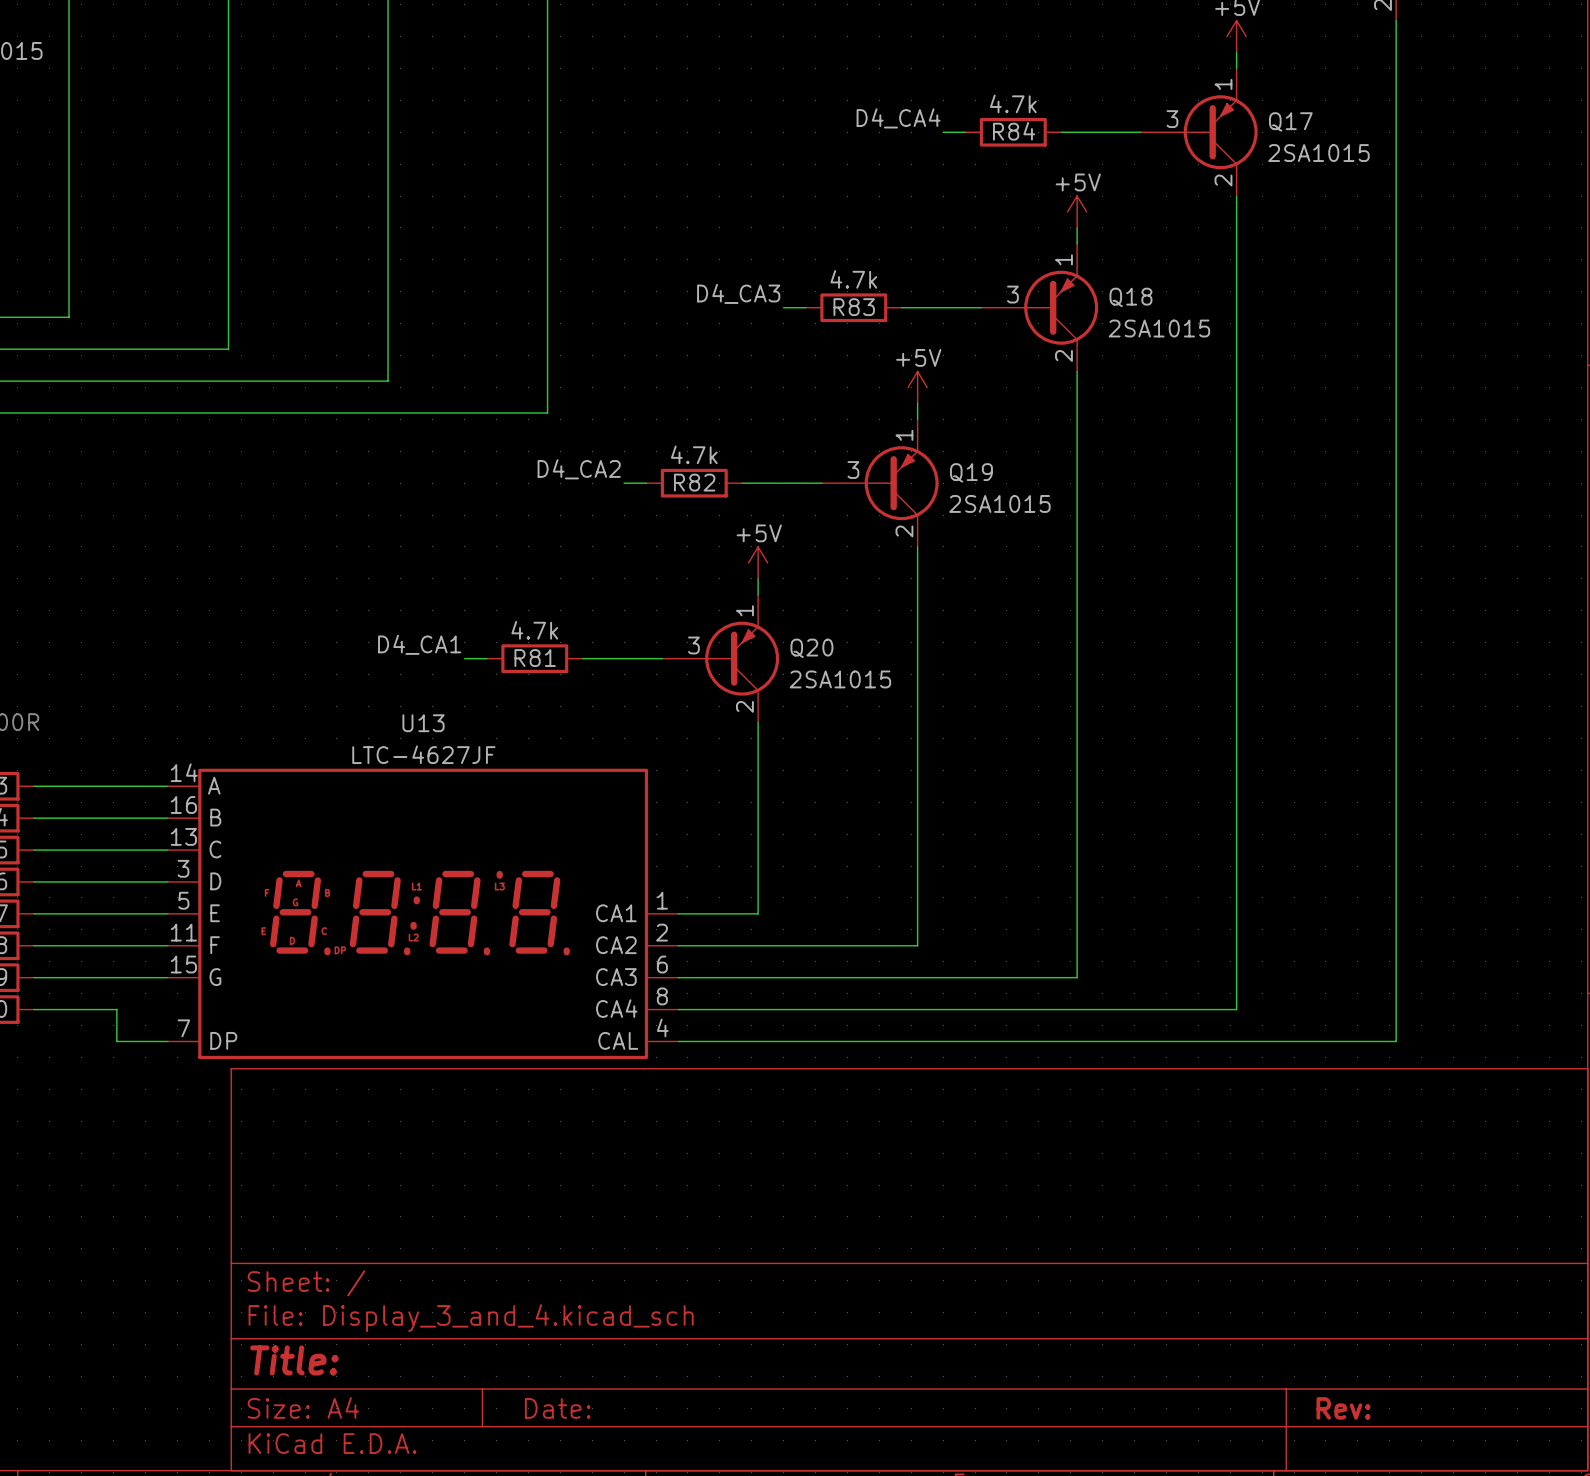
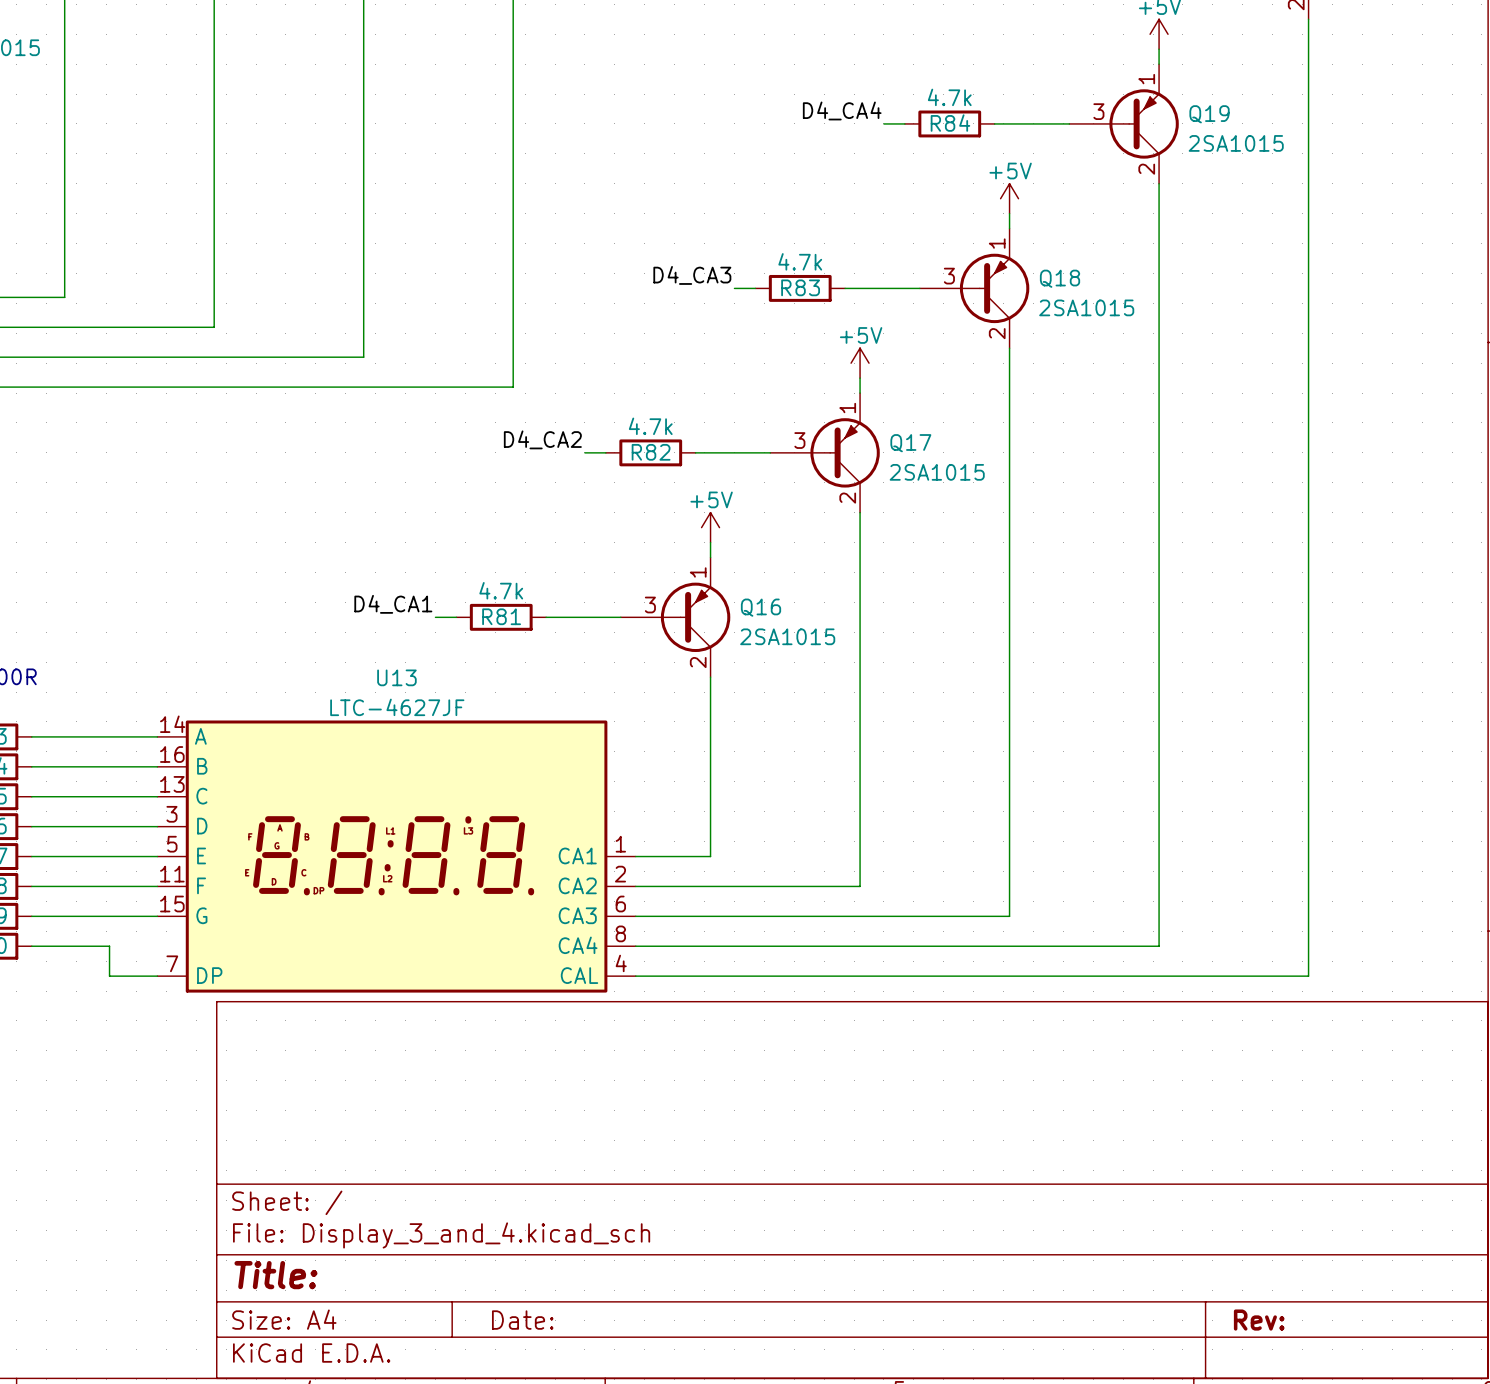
Q17 name: Q17 (1290, 121) -> Q19 (1209, 114)
Q19 name: Q19 (971, 472) -> Q17 (910, 443)
Q20 name: Q20 (811, 648) -> Q16 (761, 607)

